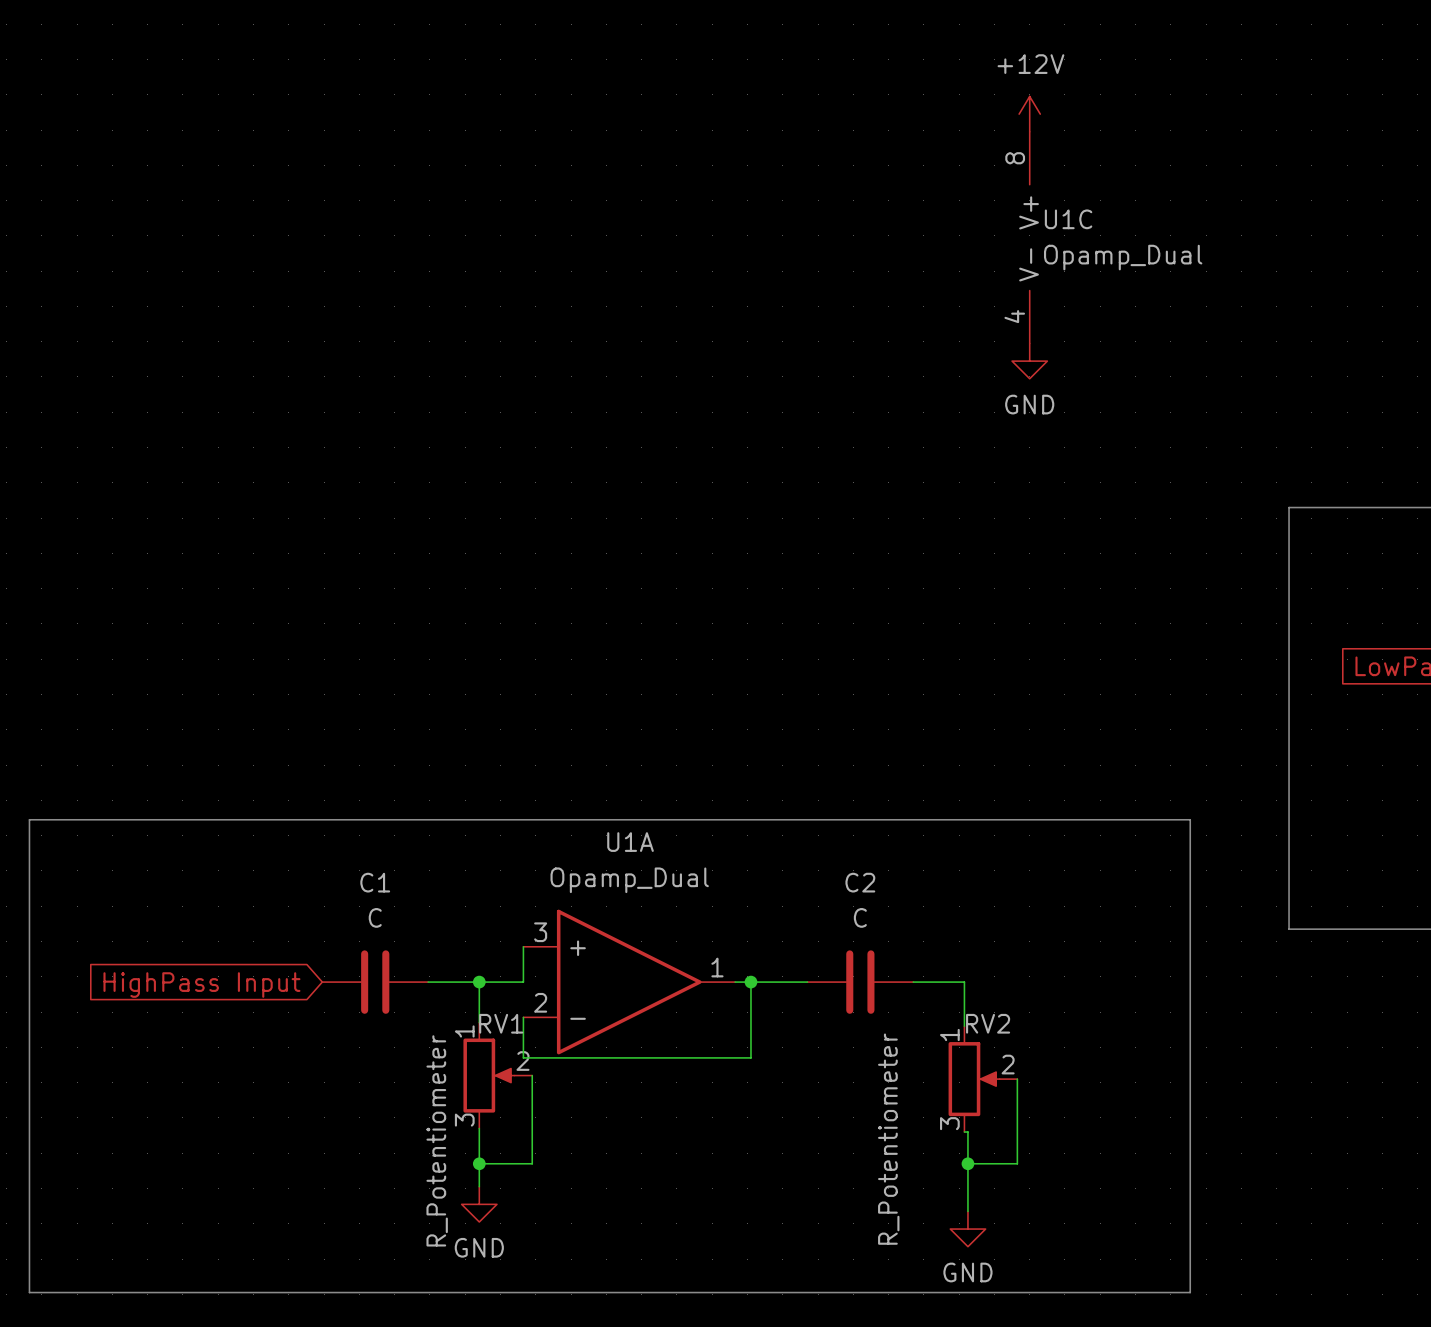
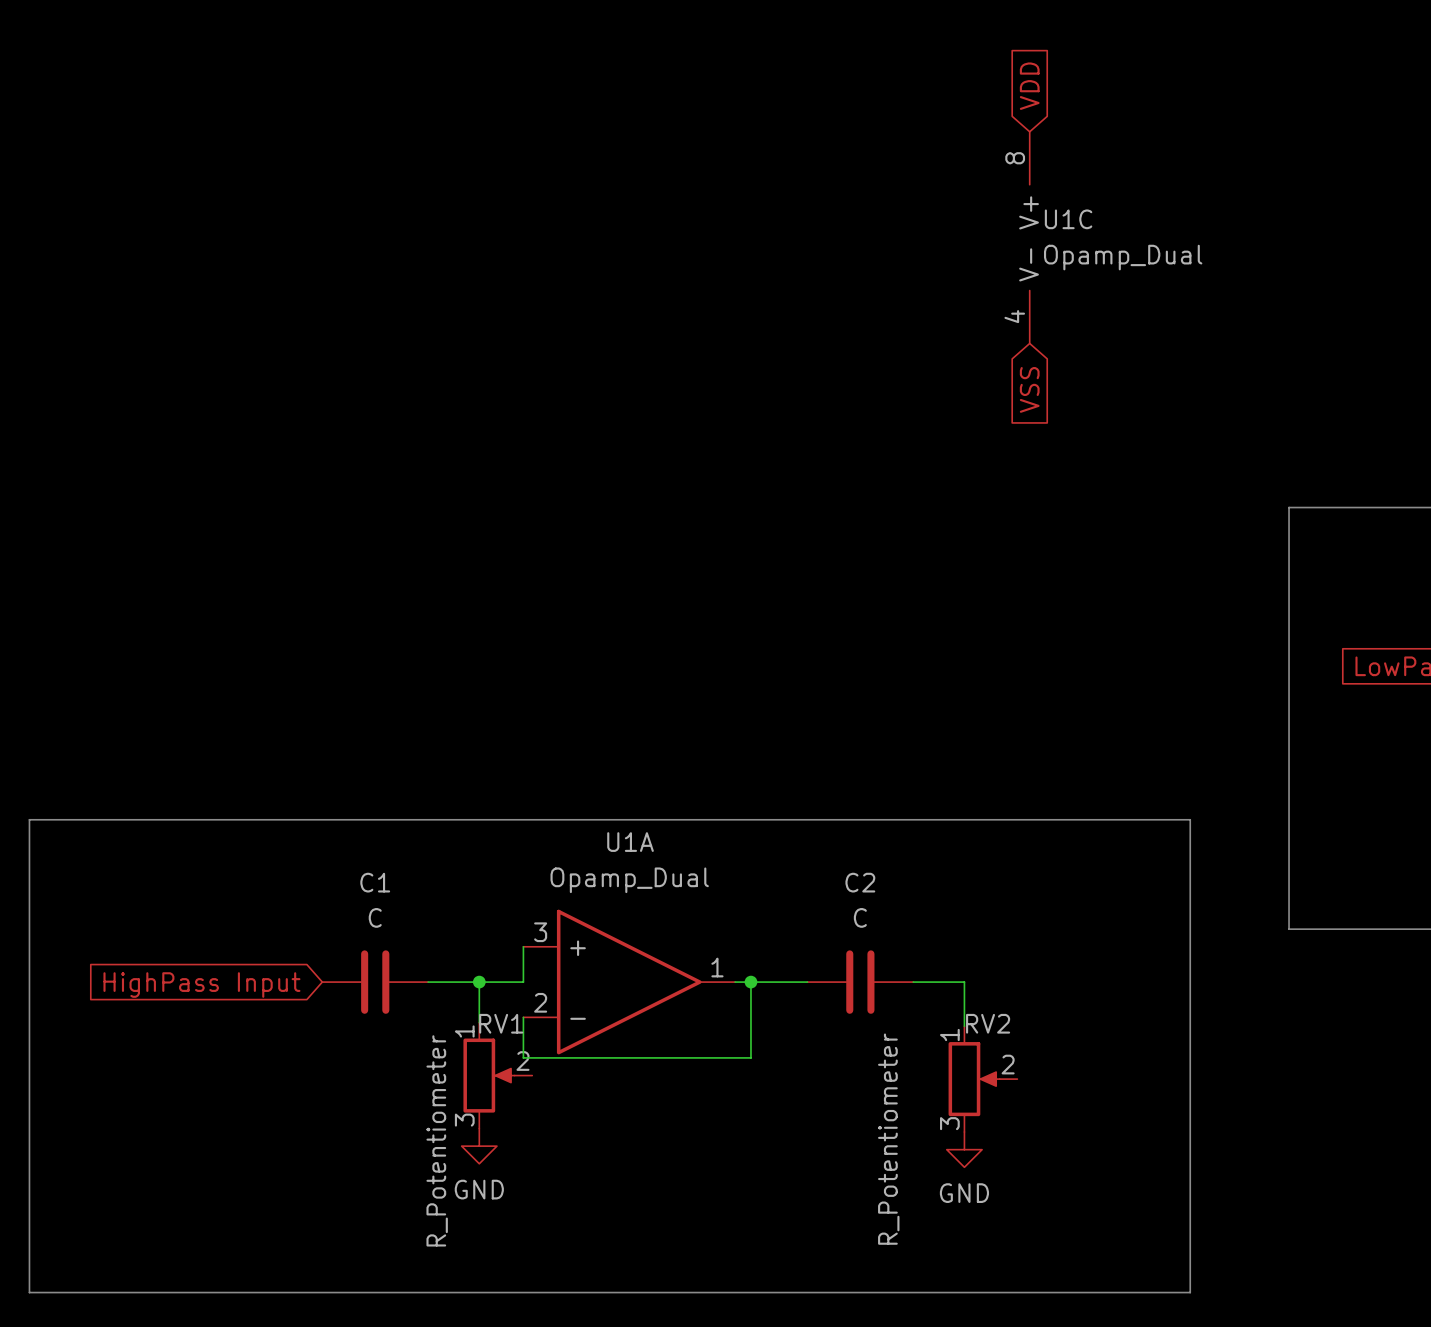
global label: none -> VDD (1029, 86)
power symbol: +12V (1029, 114) -> none
power symbol: GND (1029, 361) -> none
global label: none -> VSS (1029, 389)
wire: (532, 1075) (532, 1163) (479, 1163) -> none
wire: (1017, 1079) (1017, 1163) (967, 1163) -> none
wire: (479, 1128) (479, 1186) -> none
wire: (964, 1132) (967, 1132) (967, 1211) -> none
junction: (479, 1163) -> none
junction: (967, 1163) -> none
power symbol position: GND (479, 1204) -> GND (479, 1146)
power symbol position: GND (967, 1229) -> GND (964, 1149)

